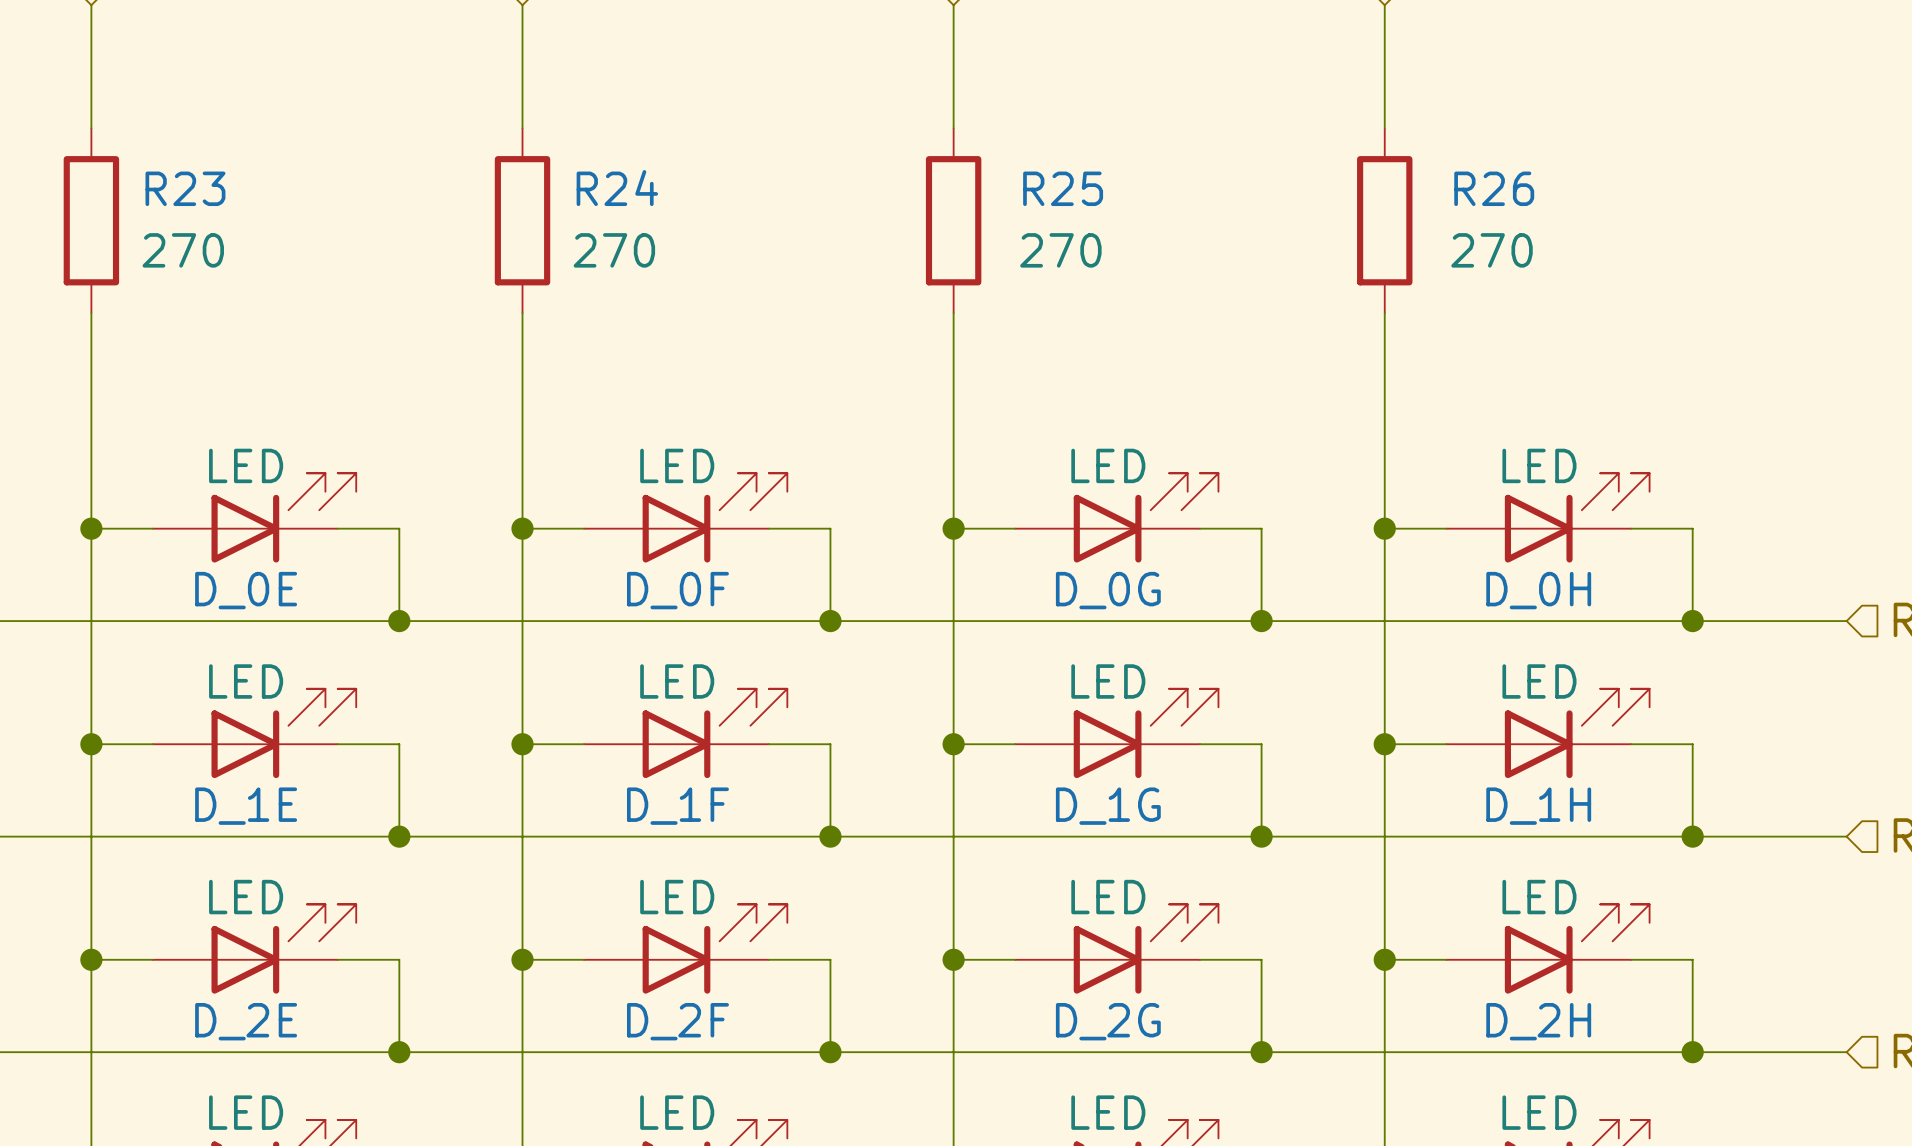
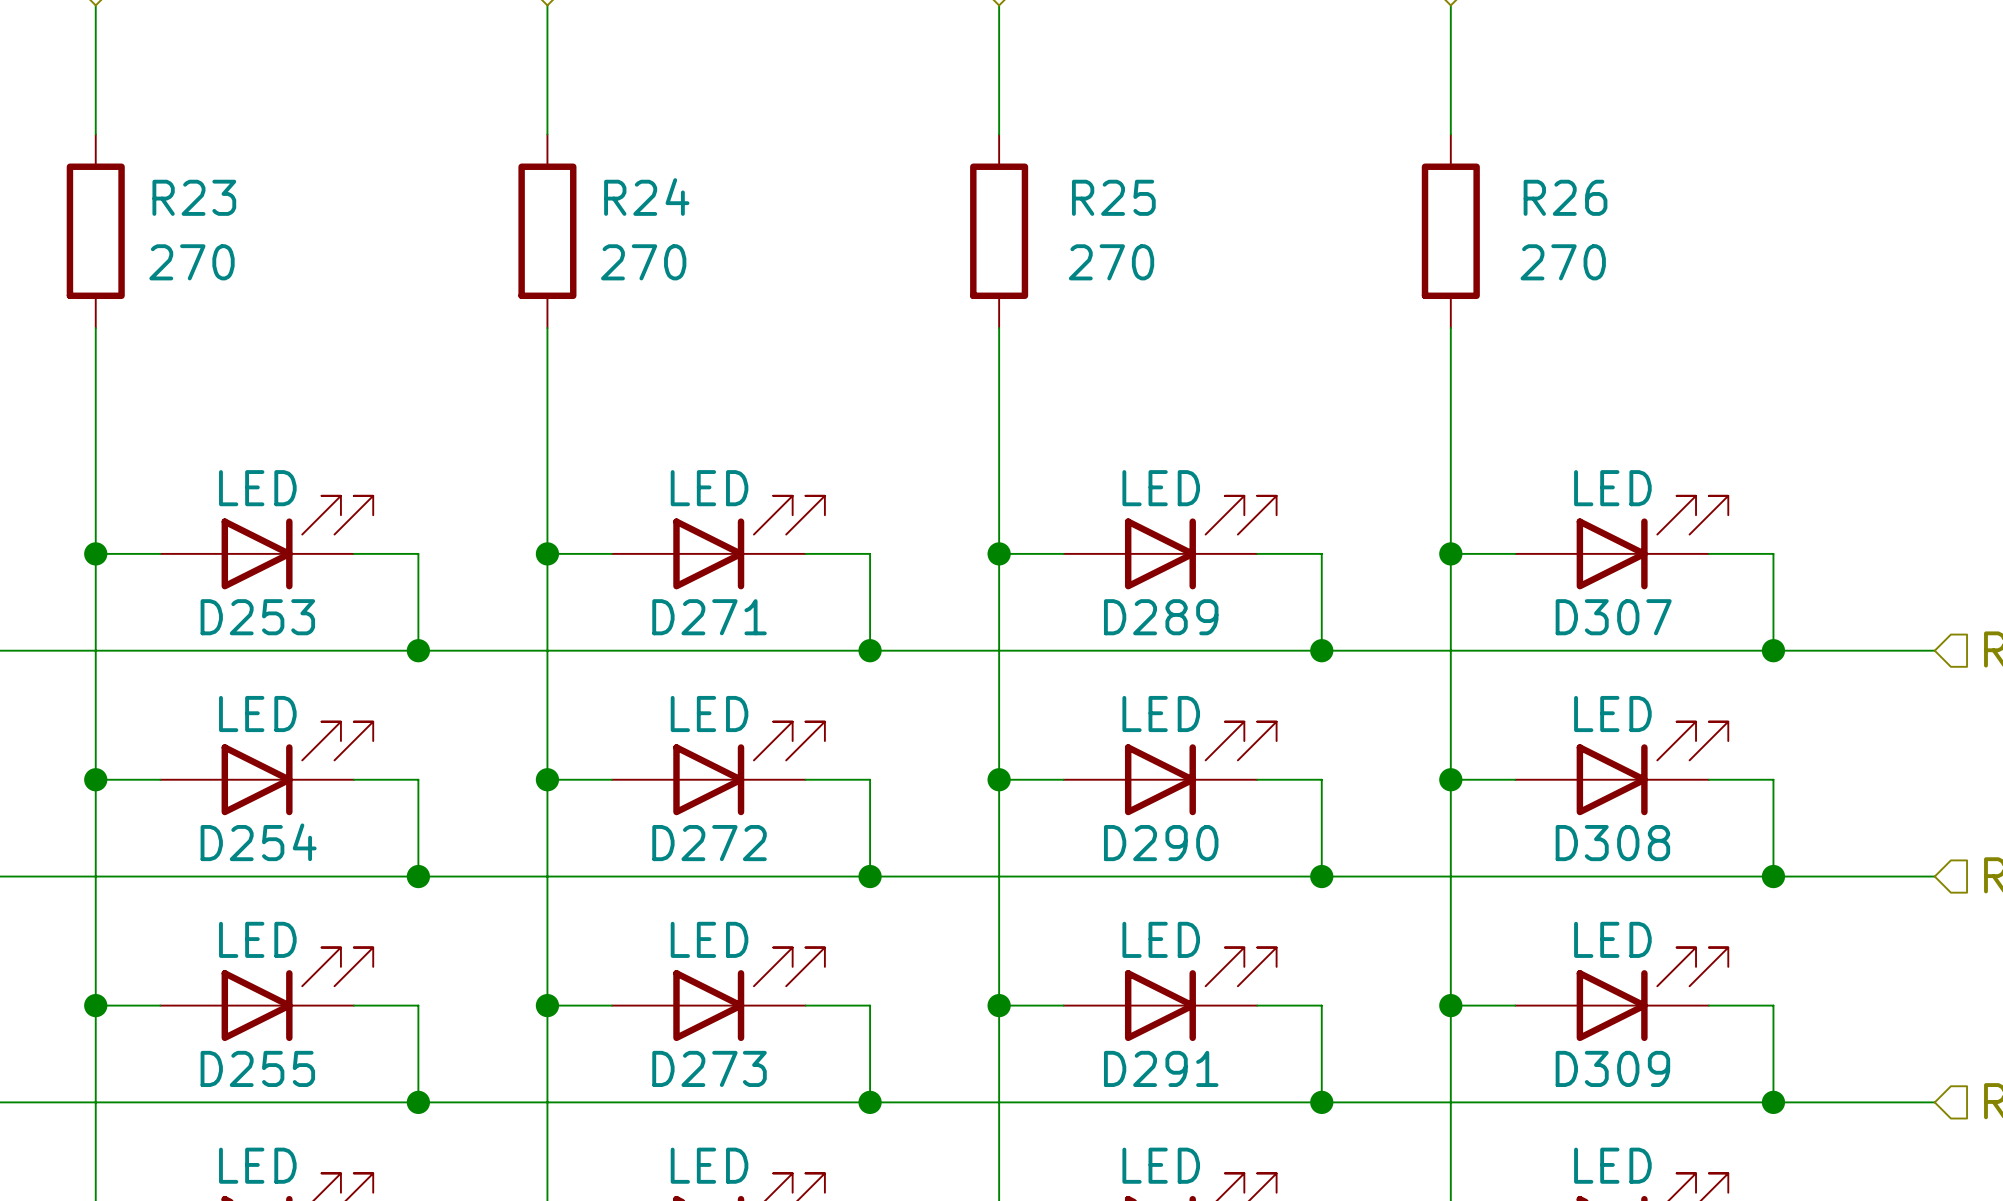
D_0E name: D_0E (246, 590) -> D253 (257, 617)
D_0F name: D_0F (677, 590) -> D271 (709, 617)
D_0G name: D_0G (1108, 590) -> D289 (1161, 617)
D_0H name: D_0H (1538, 590) -> D307 (1613, 617)
D_1E name: D_1E (246, 806) -> D254 (258, 842)
D_1F name: D_1F (677, 806) -> D272 (709, 843)
D_1G name: D_1G (1108, 806) -> D290 (1161, 843)
D_1H name: D_1H (1538, 806) -> D308 (1612, 843)
D_2E name: D_2E (246, 1021) -> D255 (257, 1068)
D_2F name: D_2F (677, 1021) -> D273 (709, 1068)
D_2G name: D_2G (1108, 1021) -> D291 (1161, 1068)
D_2H name: D_2H (1538, 1021) -> D309 (1612, 1068)

